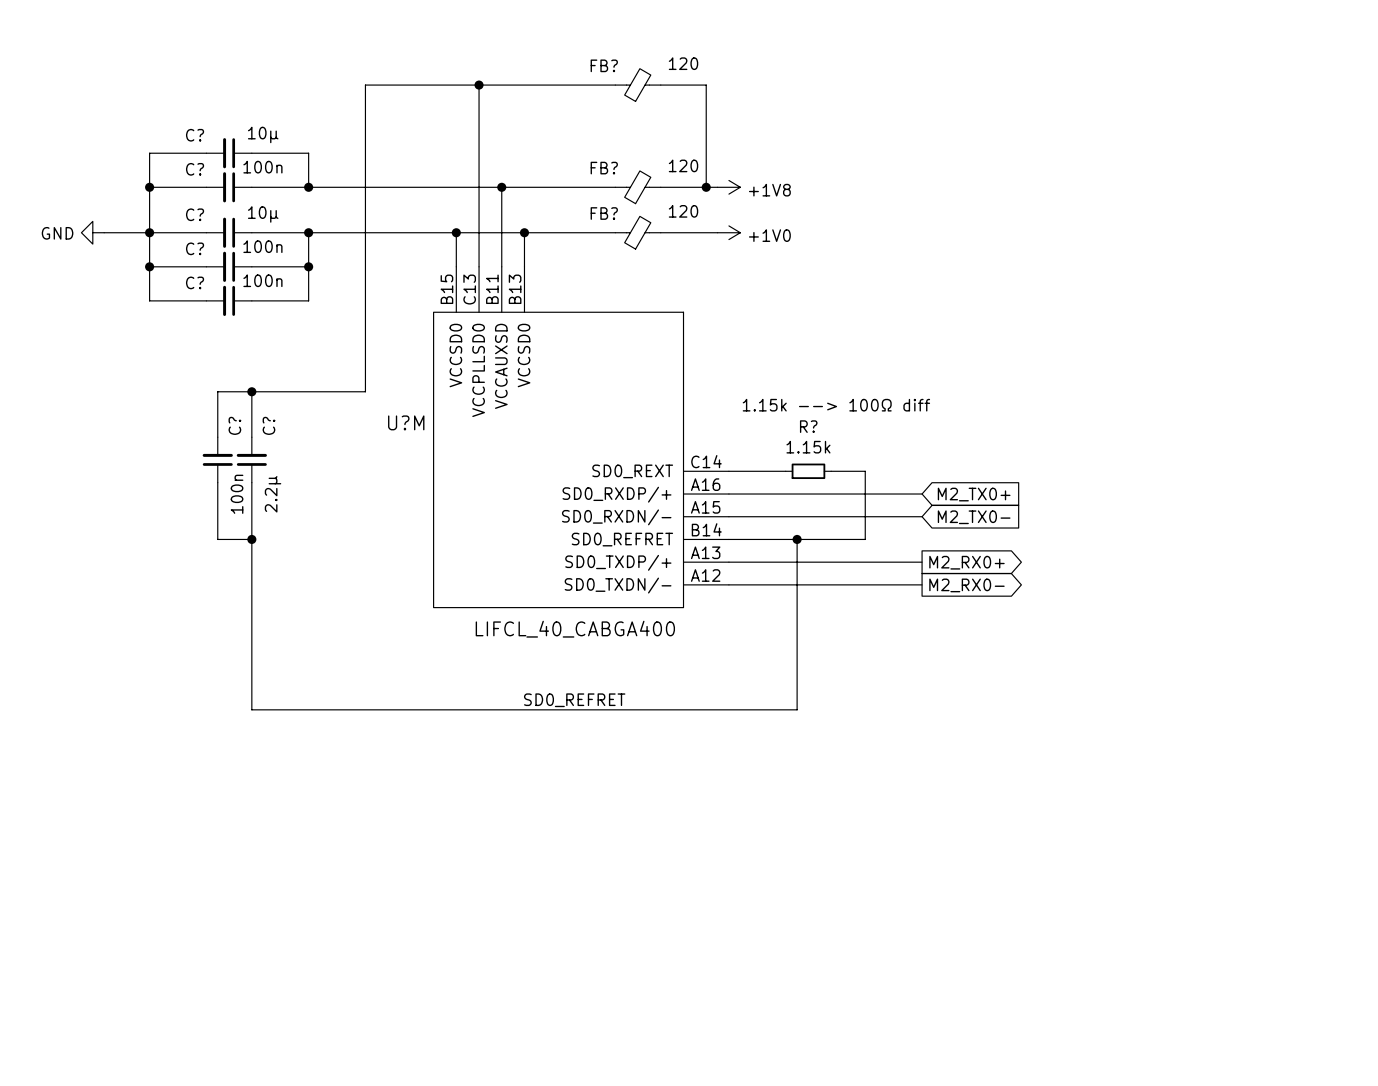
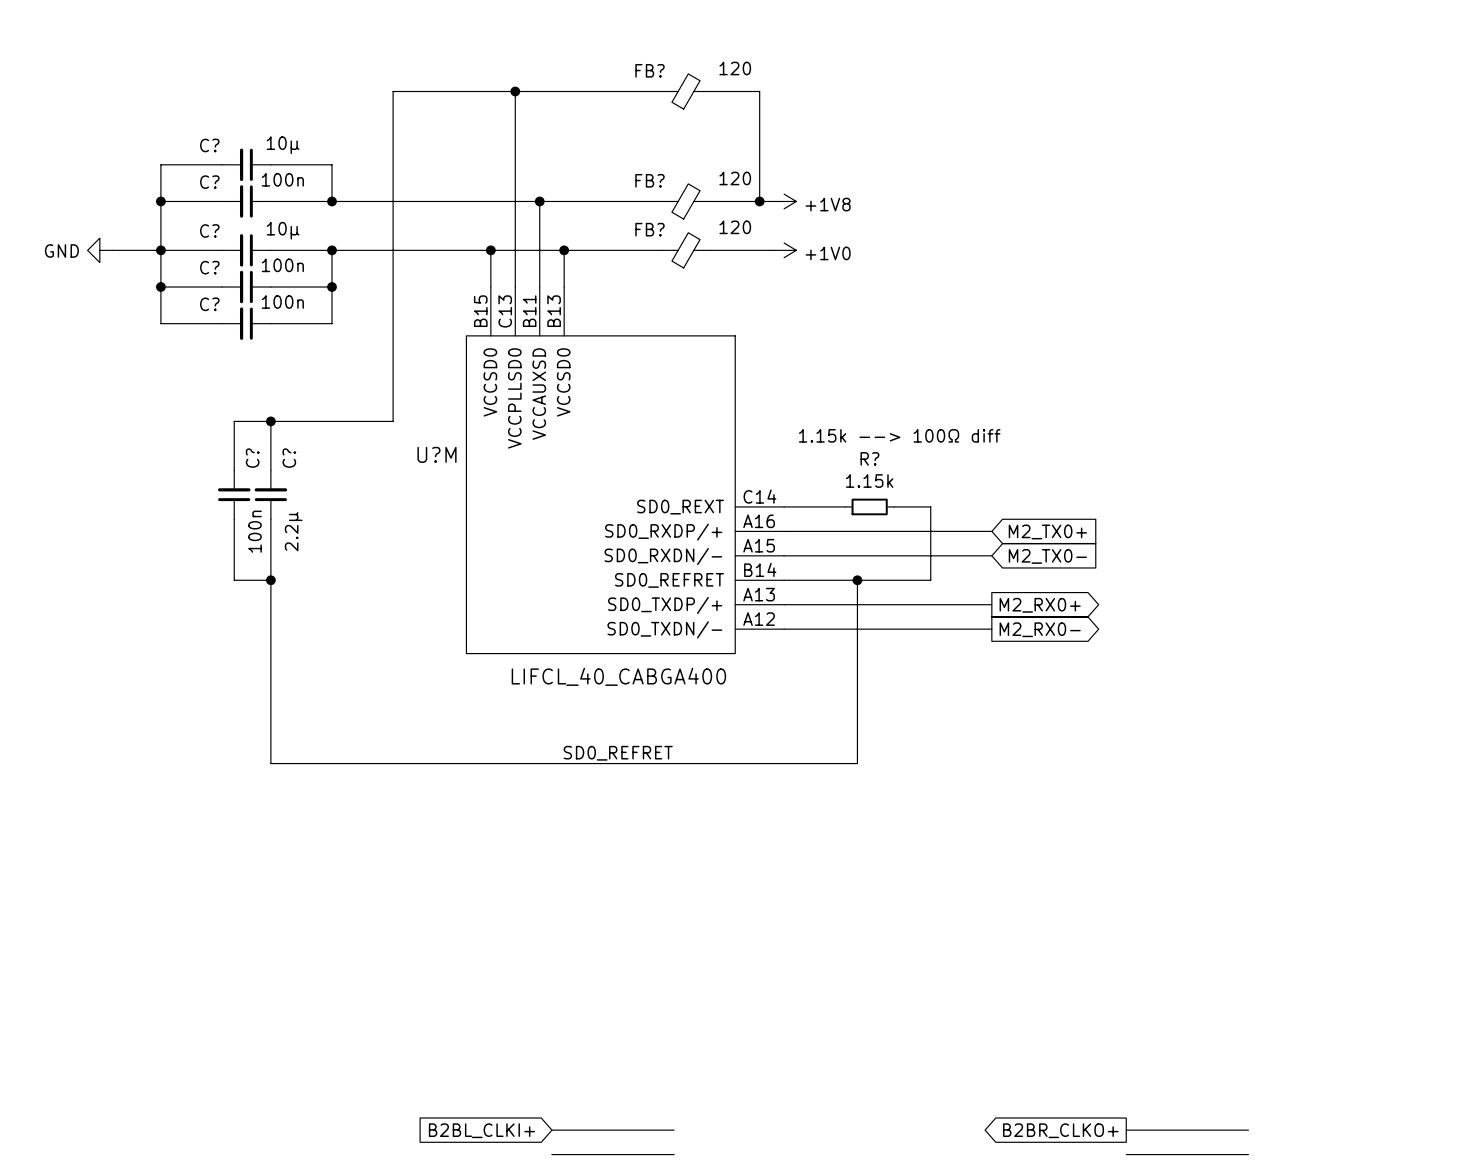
wire: none -> (551, 1130) (674, 1130)
wire: none -> (1126, 1130) (1248, 1130)
global label: none -> B2BL_CLKI+ (481, 1130)
global label: none -> B2BR_CLKO+ (1060, 1130)
wire: none -> (551, 1154) (674, 1154)
wire: none -> (1126, 1154) (1248, 1154)

